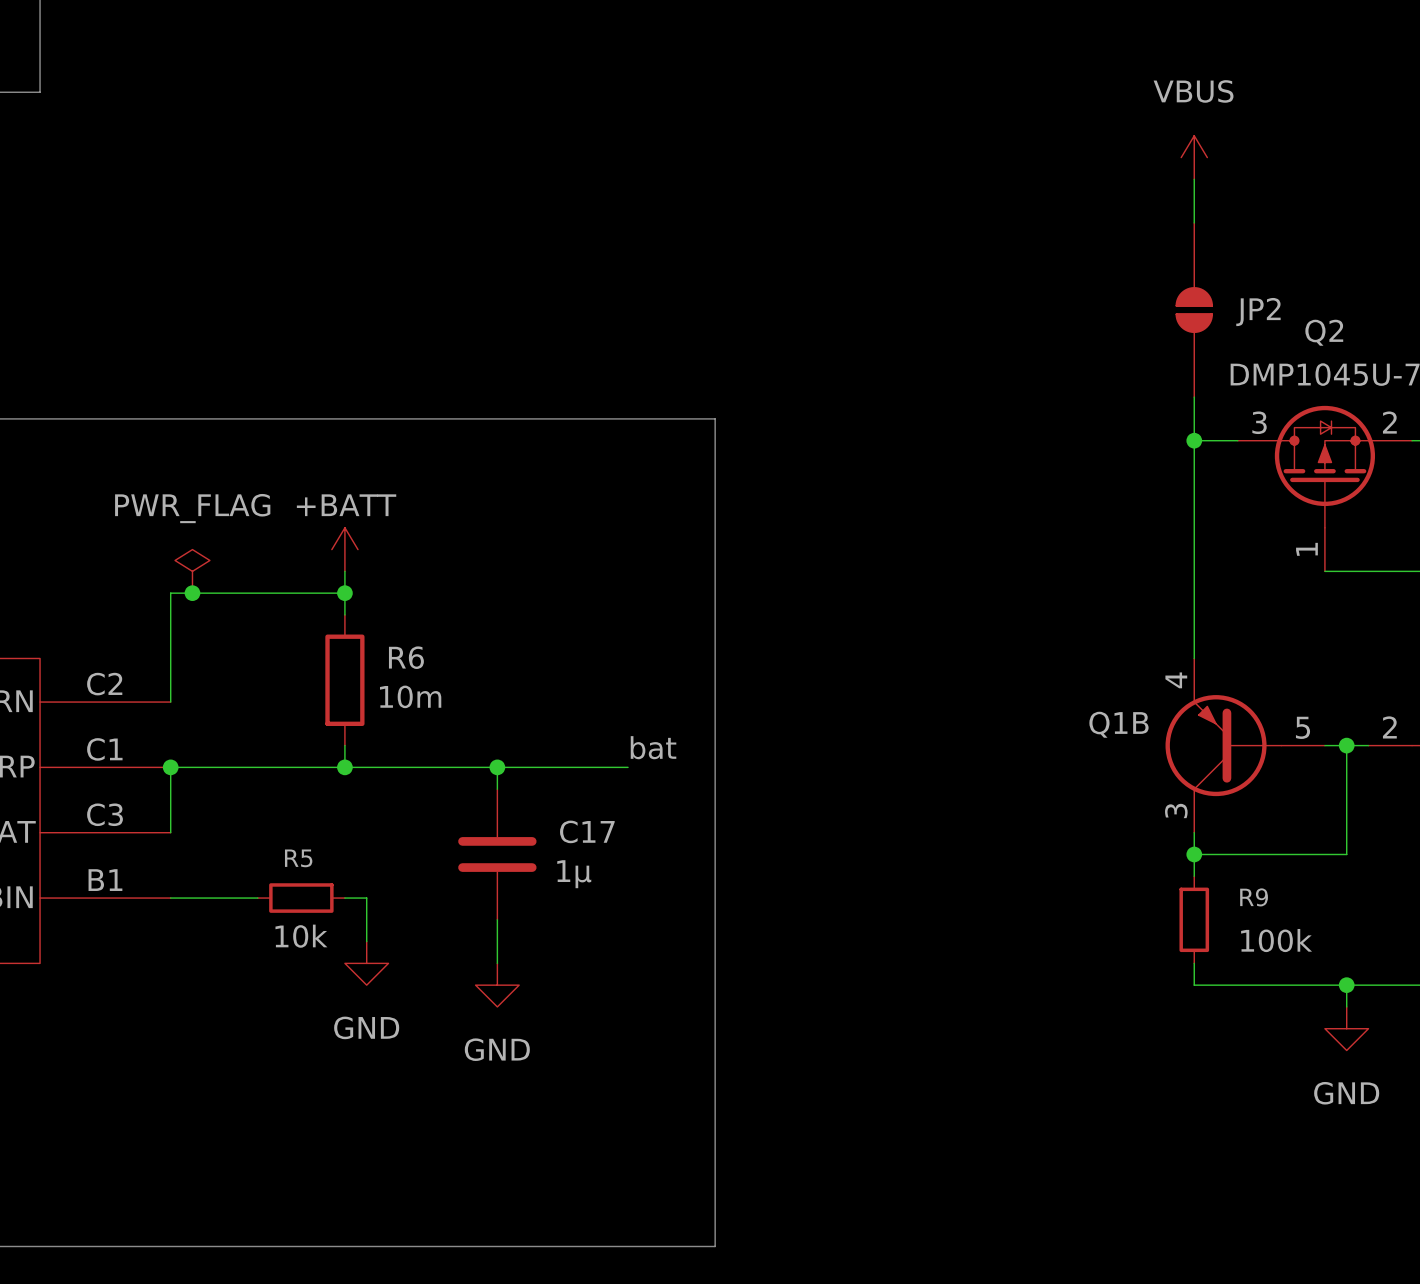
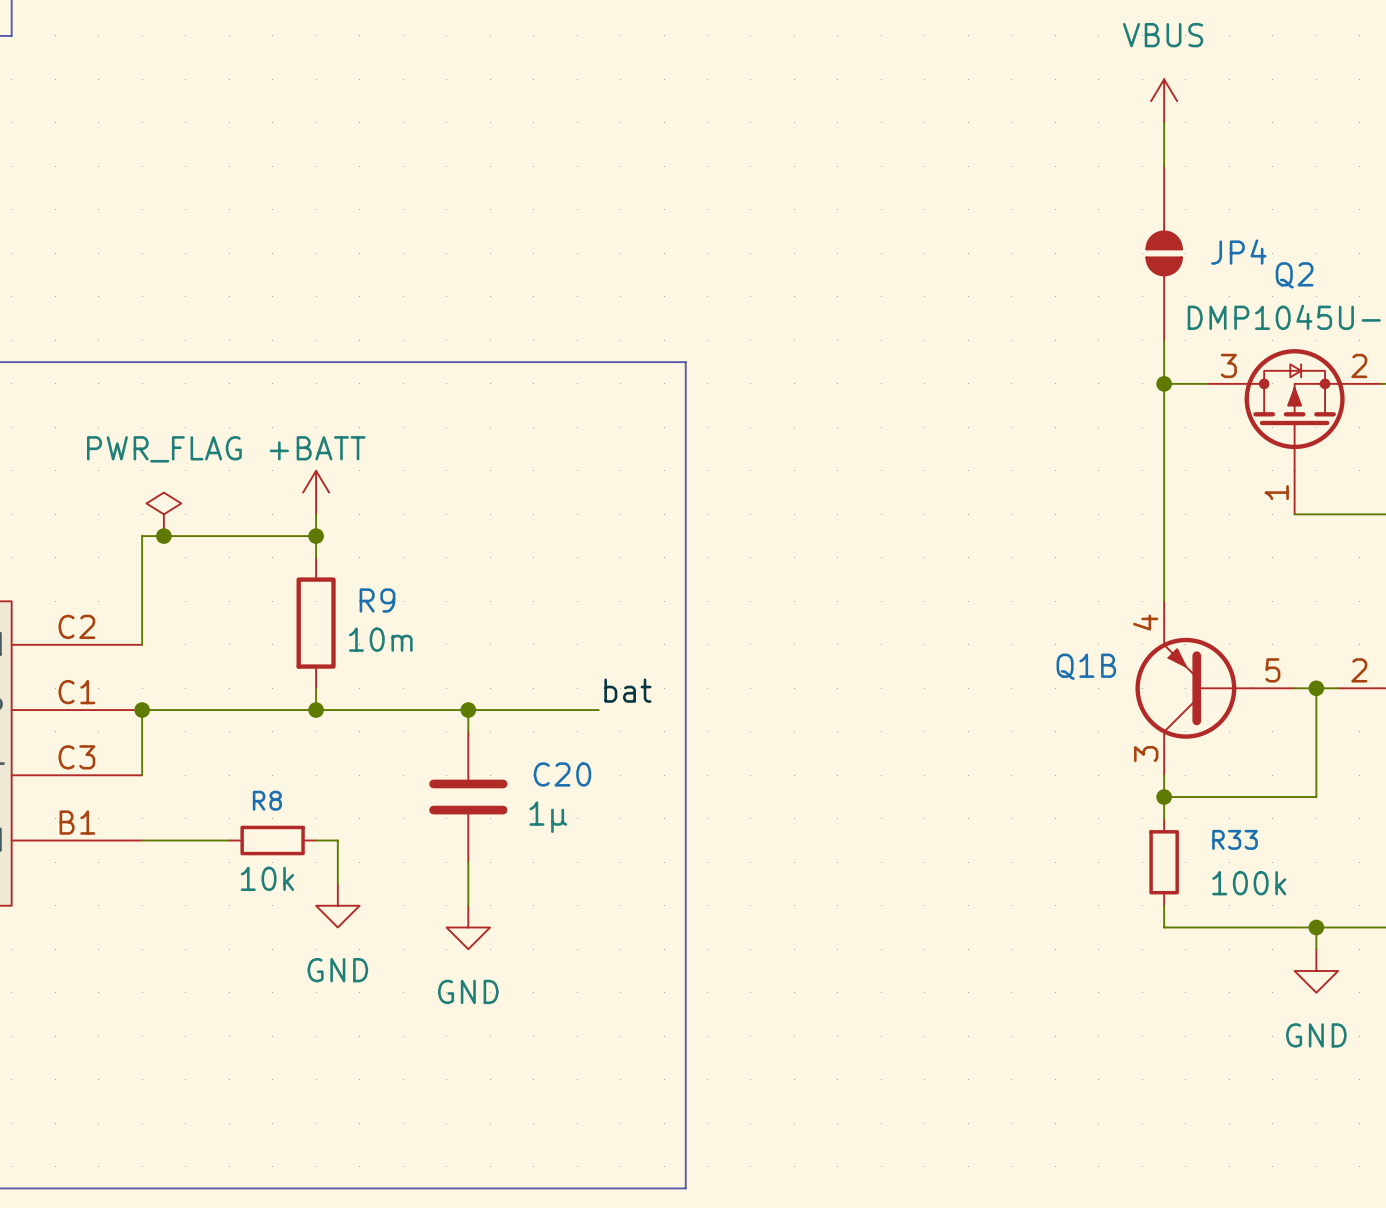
JP2 name: JP2 (1258, 312) -> JP4 (1238, 252)
R6 name: R6 (406, 657) -> R9 (377, 600)
C17 name: C17 (587, 831) -> C20 (562, 774)
R5 name: R5 (298, 858) -> R8 (267, 800)
R9 name: R9 (1254, 897) -> R33 (1235, 839)

